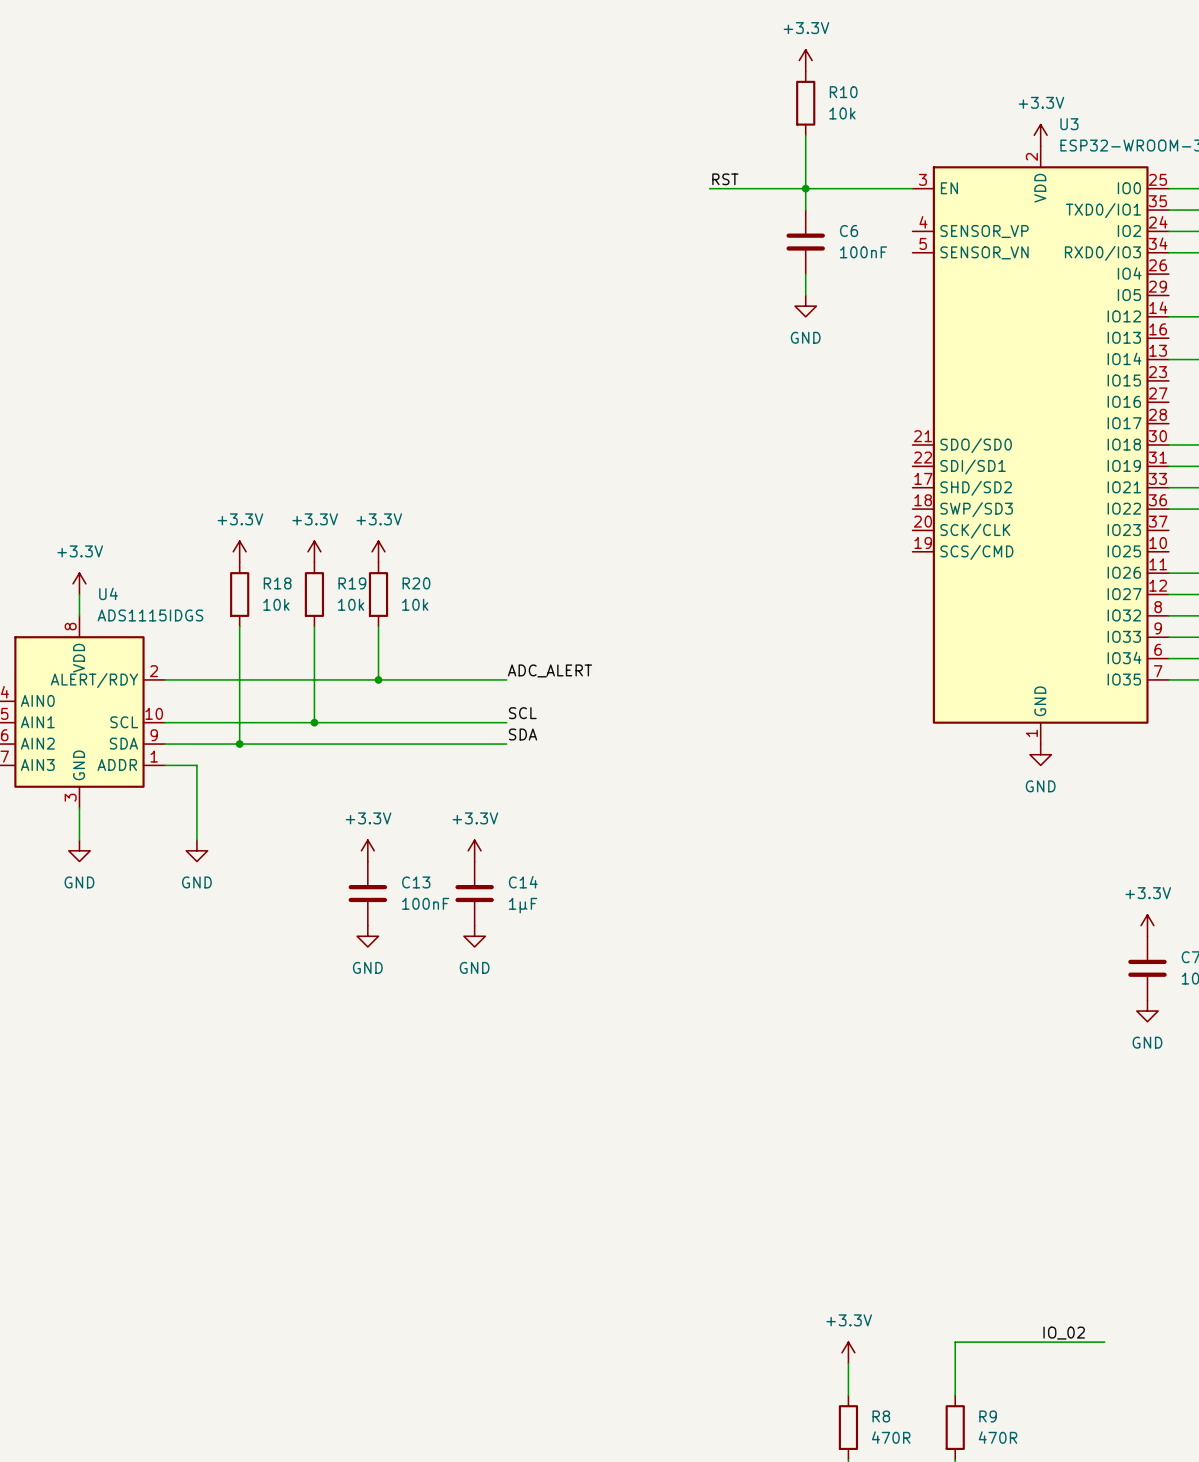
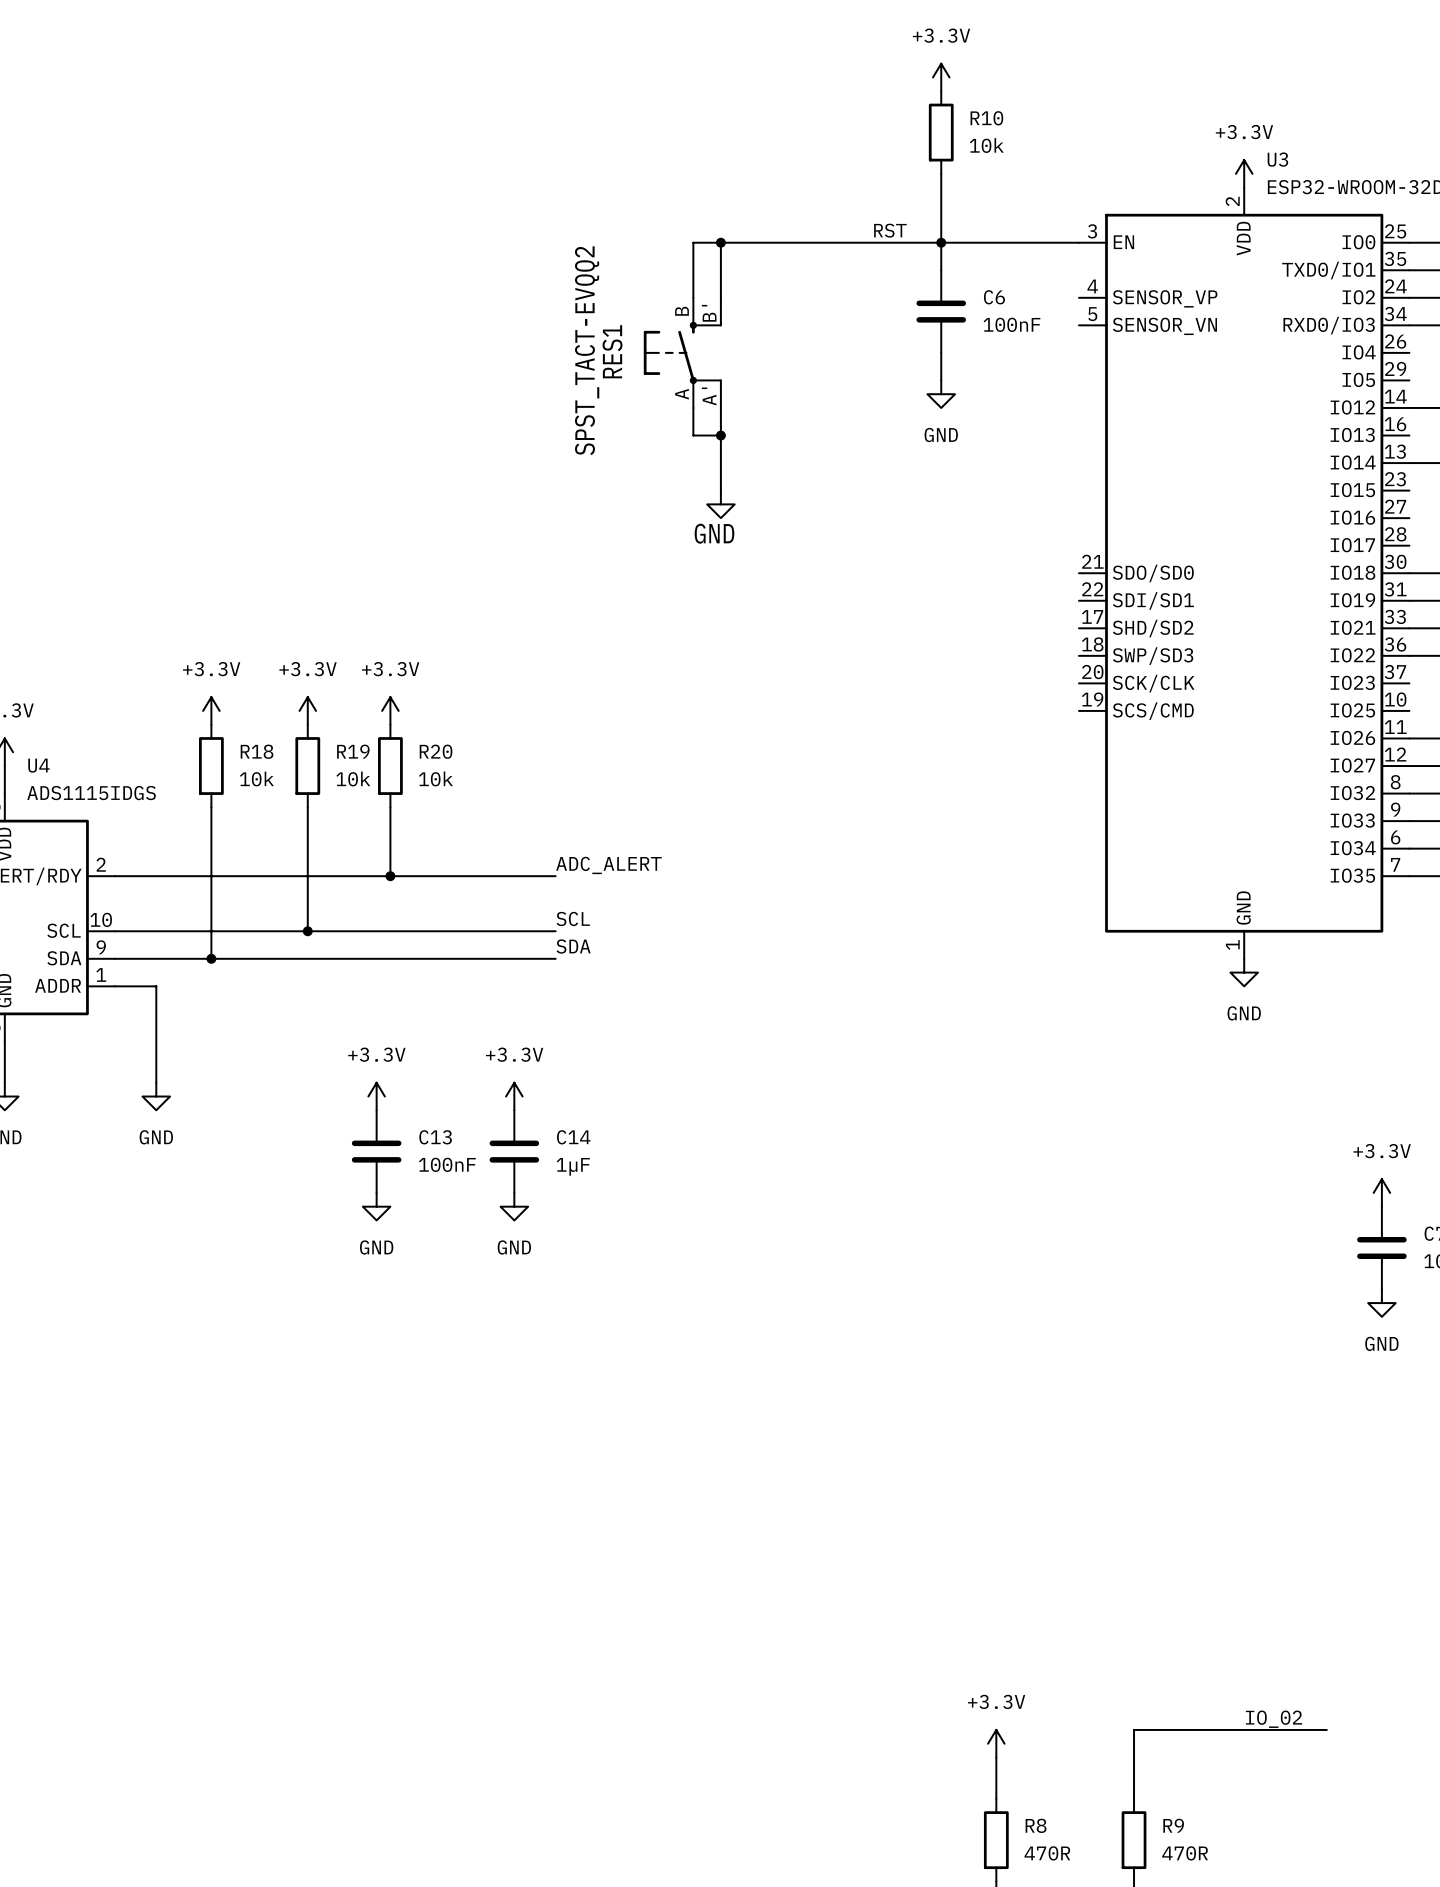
label position: RST (725, 179) -> RST (890, 230)
wire: none -> (720, 242) (720, 297)
junction: none -> (720, 242)
wire: none -> (817, 242) (693, 242) (693, 297)
RES1: none -> SPST_TACT-EVQQ2 (682, 352)
wire: none -> (693, 407) (693, 435) (720, 435)
wire: none -> (720, 407) (720, 490)
junction: none -> (720, 435)
power symbol: none -> GND (720, 504)

